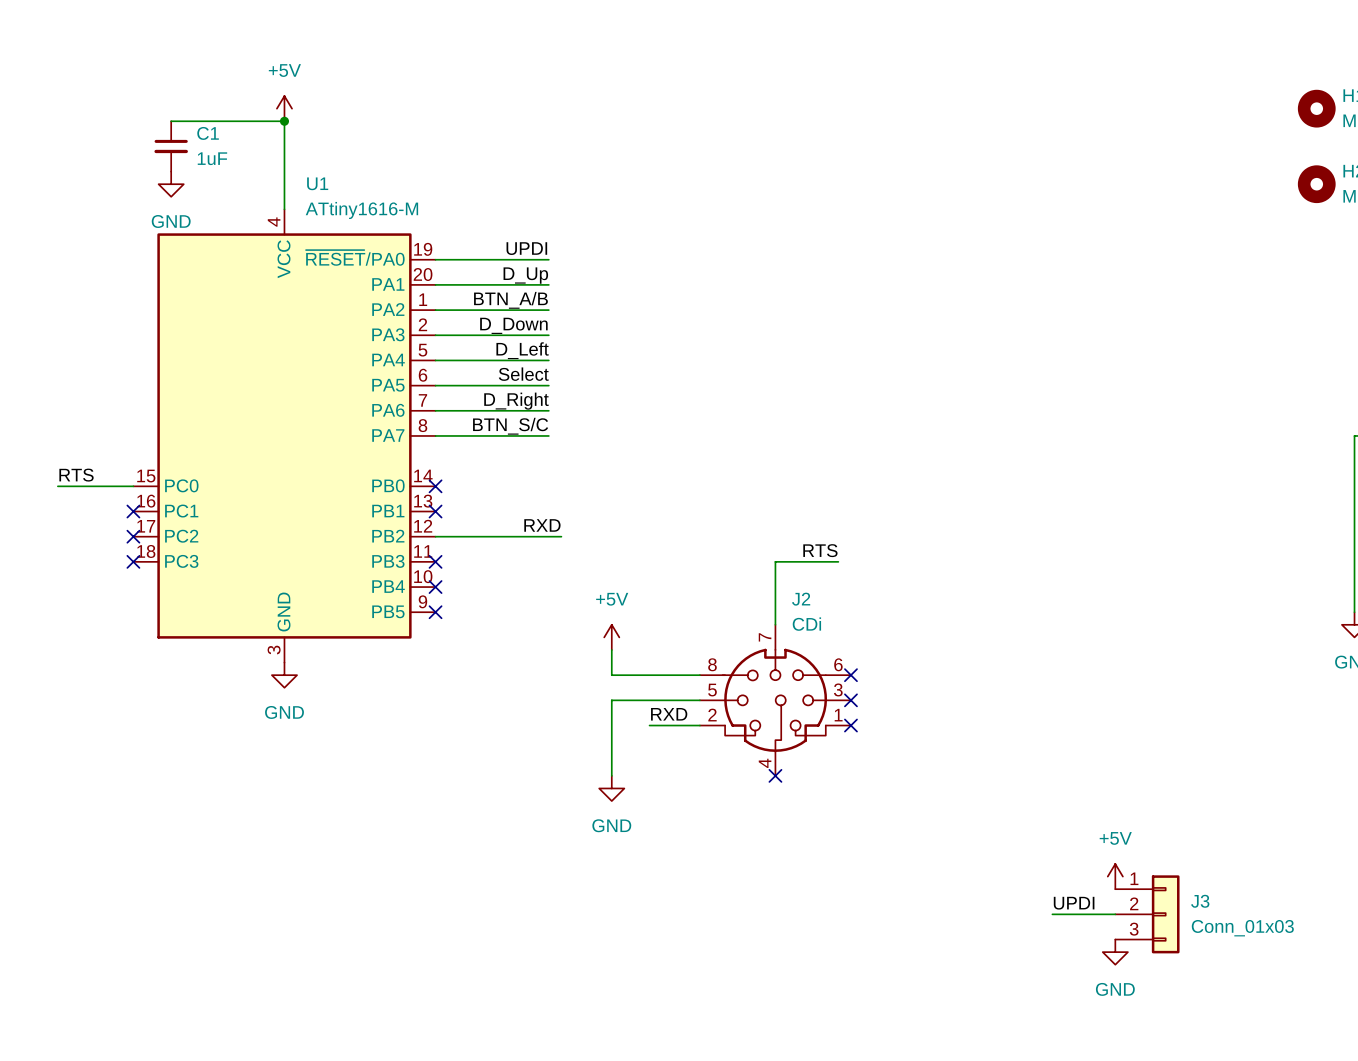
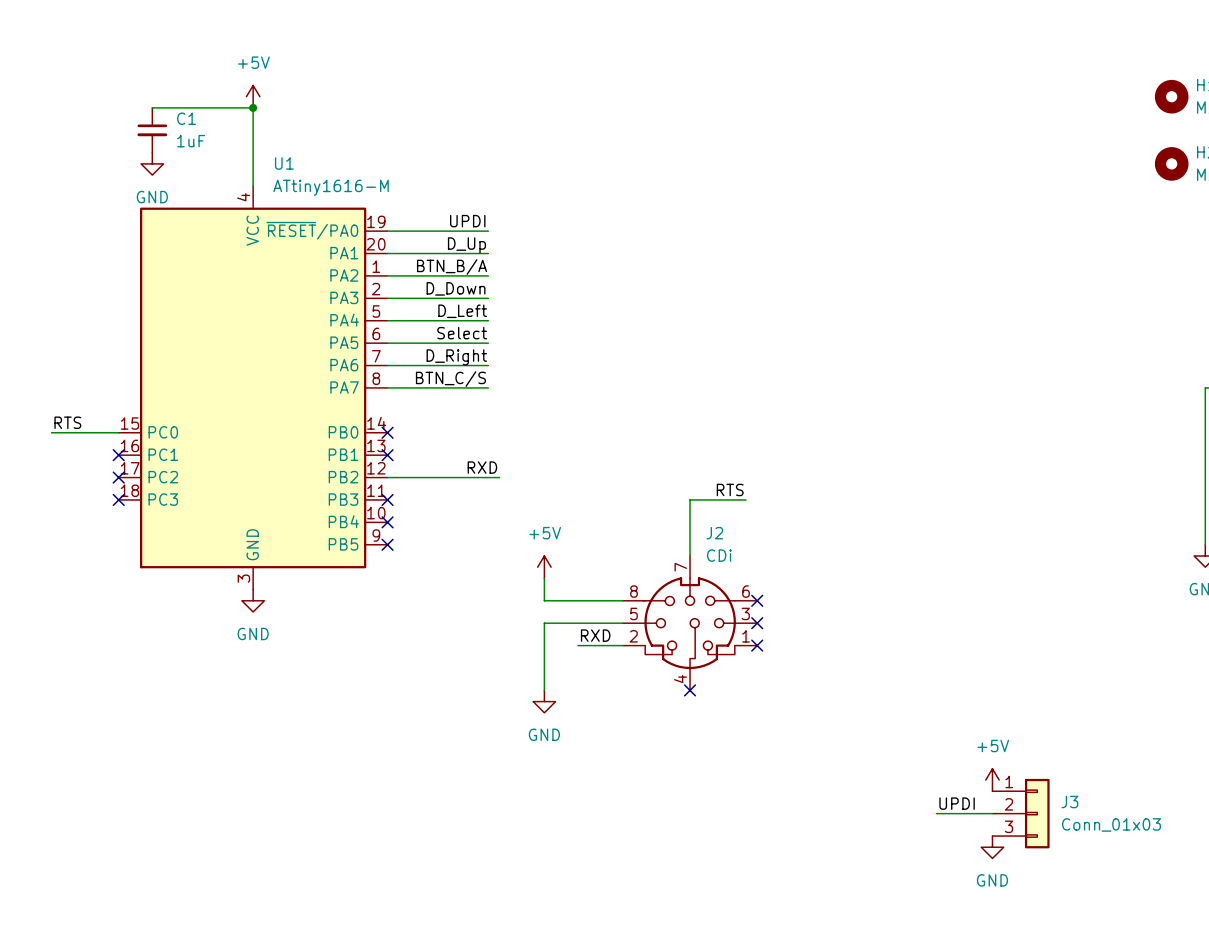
label: BTN_A/B (510, 300) -> BTN_B/A (452, 267)
label: BTN_S/C (510, 426) -> BTN_C/S (450, 379)

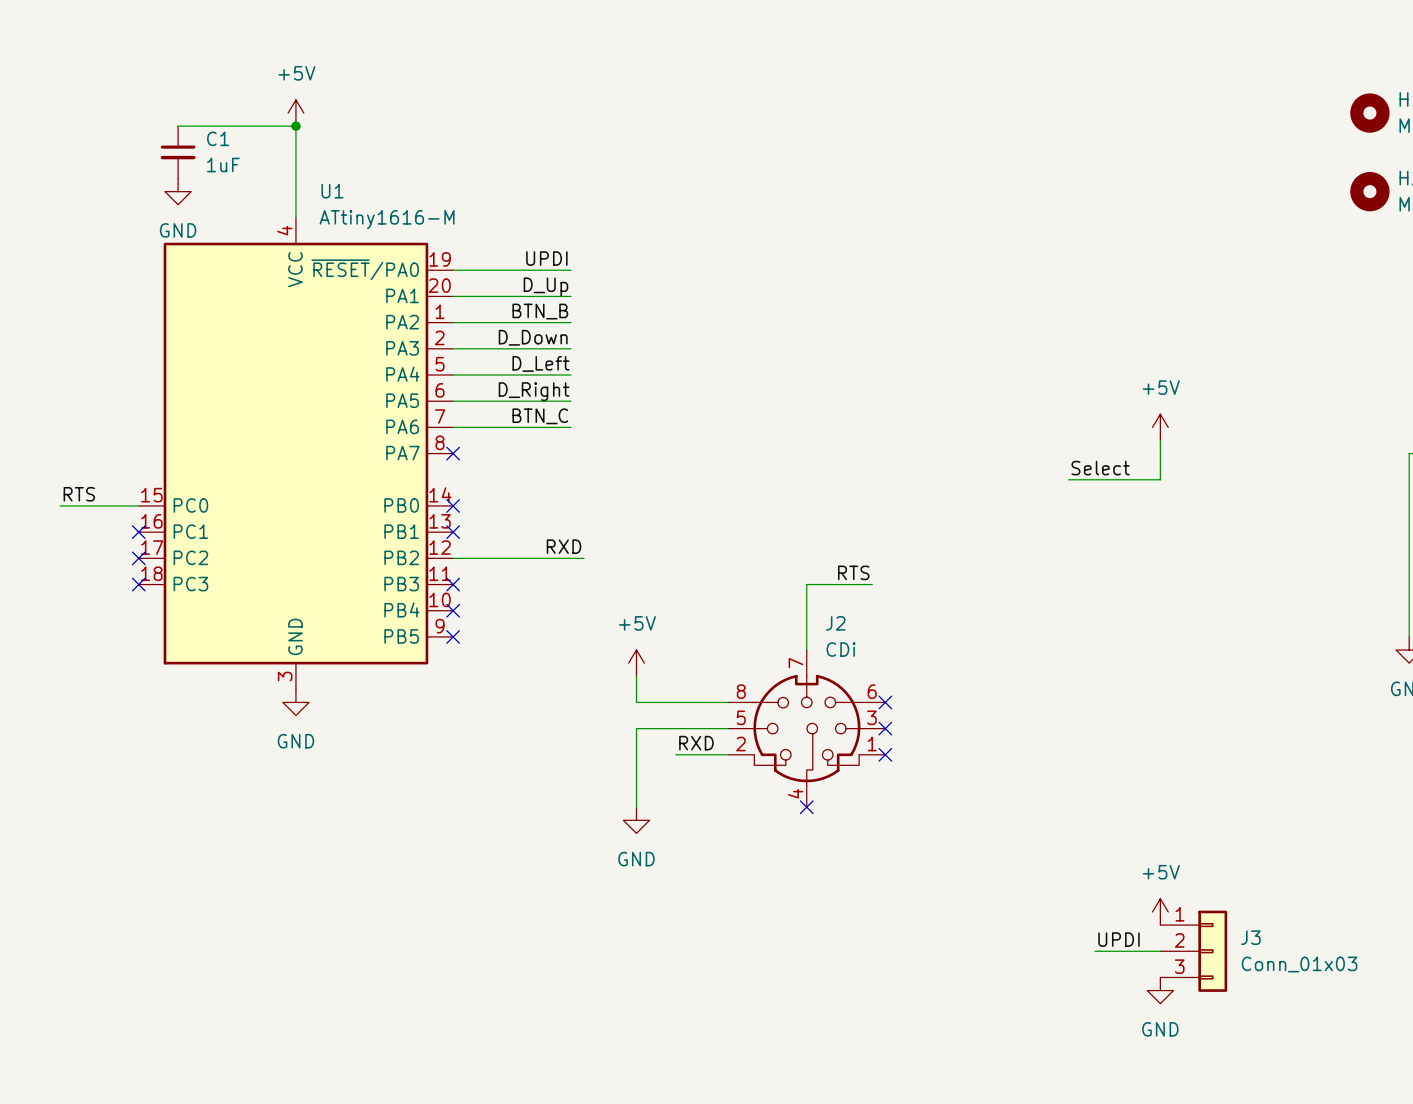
label: BTN_B/A (452, 267) -> BTN_B (540, 311)
label: Select (462, 333) -> D_Right (534, 391)
label: D_Right (456, 357) -> BTN_C (540, 416)
power symbol: none -> +5V (1160, 427)
wire: none -> (1160, 440) (1160, 479) (1068, 479)
label: BTN_C/S (450, 379) -> none
wire: (387, 387) (488, 387) -> none
no-connect mark: none -> (453, 453)
label: none -> Select (1100, 468)

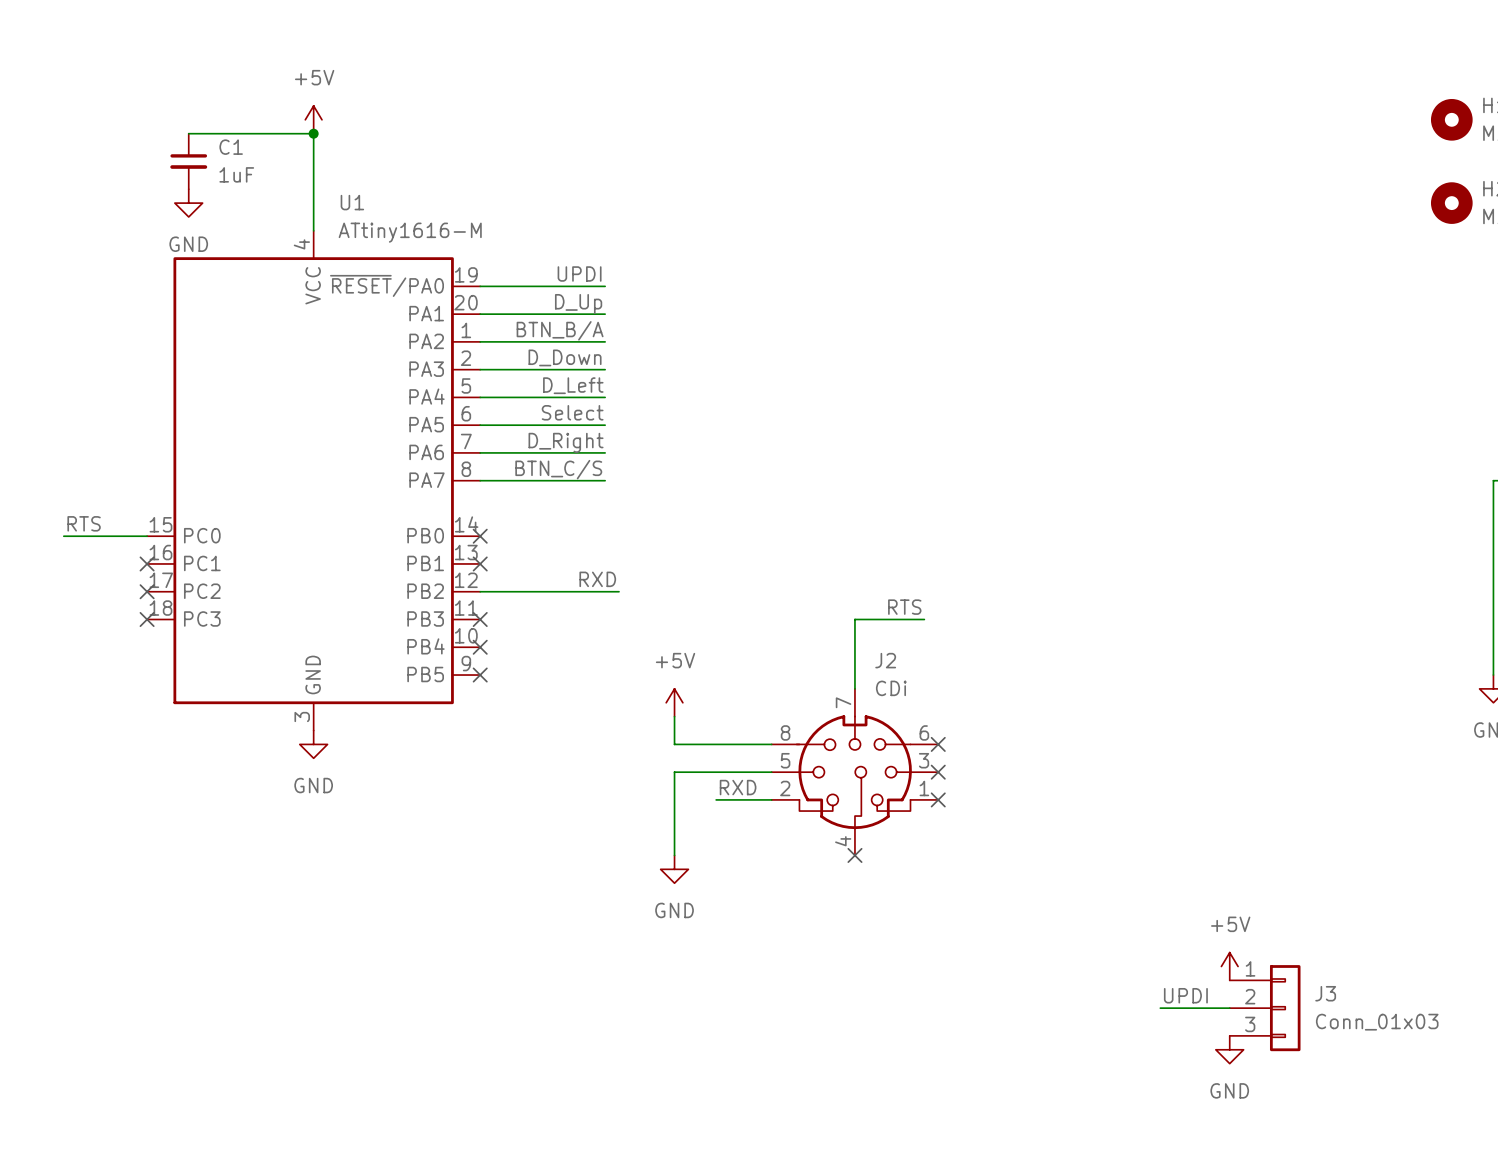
label: BTN_B (540, 311) -> BTN_B/A (560, 330)
label: D_Right (534, 391) -> Select (572, 412)
label: BTN_C (540, 416) -> D_Right (566, 442)
power symbol: +5V (1160, 427) -> none
wire: (1160, 440) (1160, 479) (1068, 479) -> none
label: none -> BTN_C/S (558, 469)
wire: none -> (480, 480) (605, 480)
no-connect mark: (453, 453) -> none
label: Select (1100, 468) -> none

